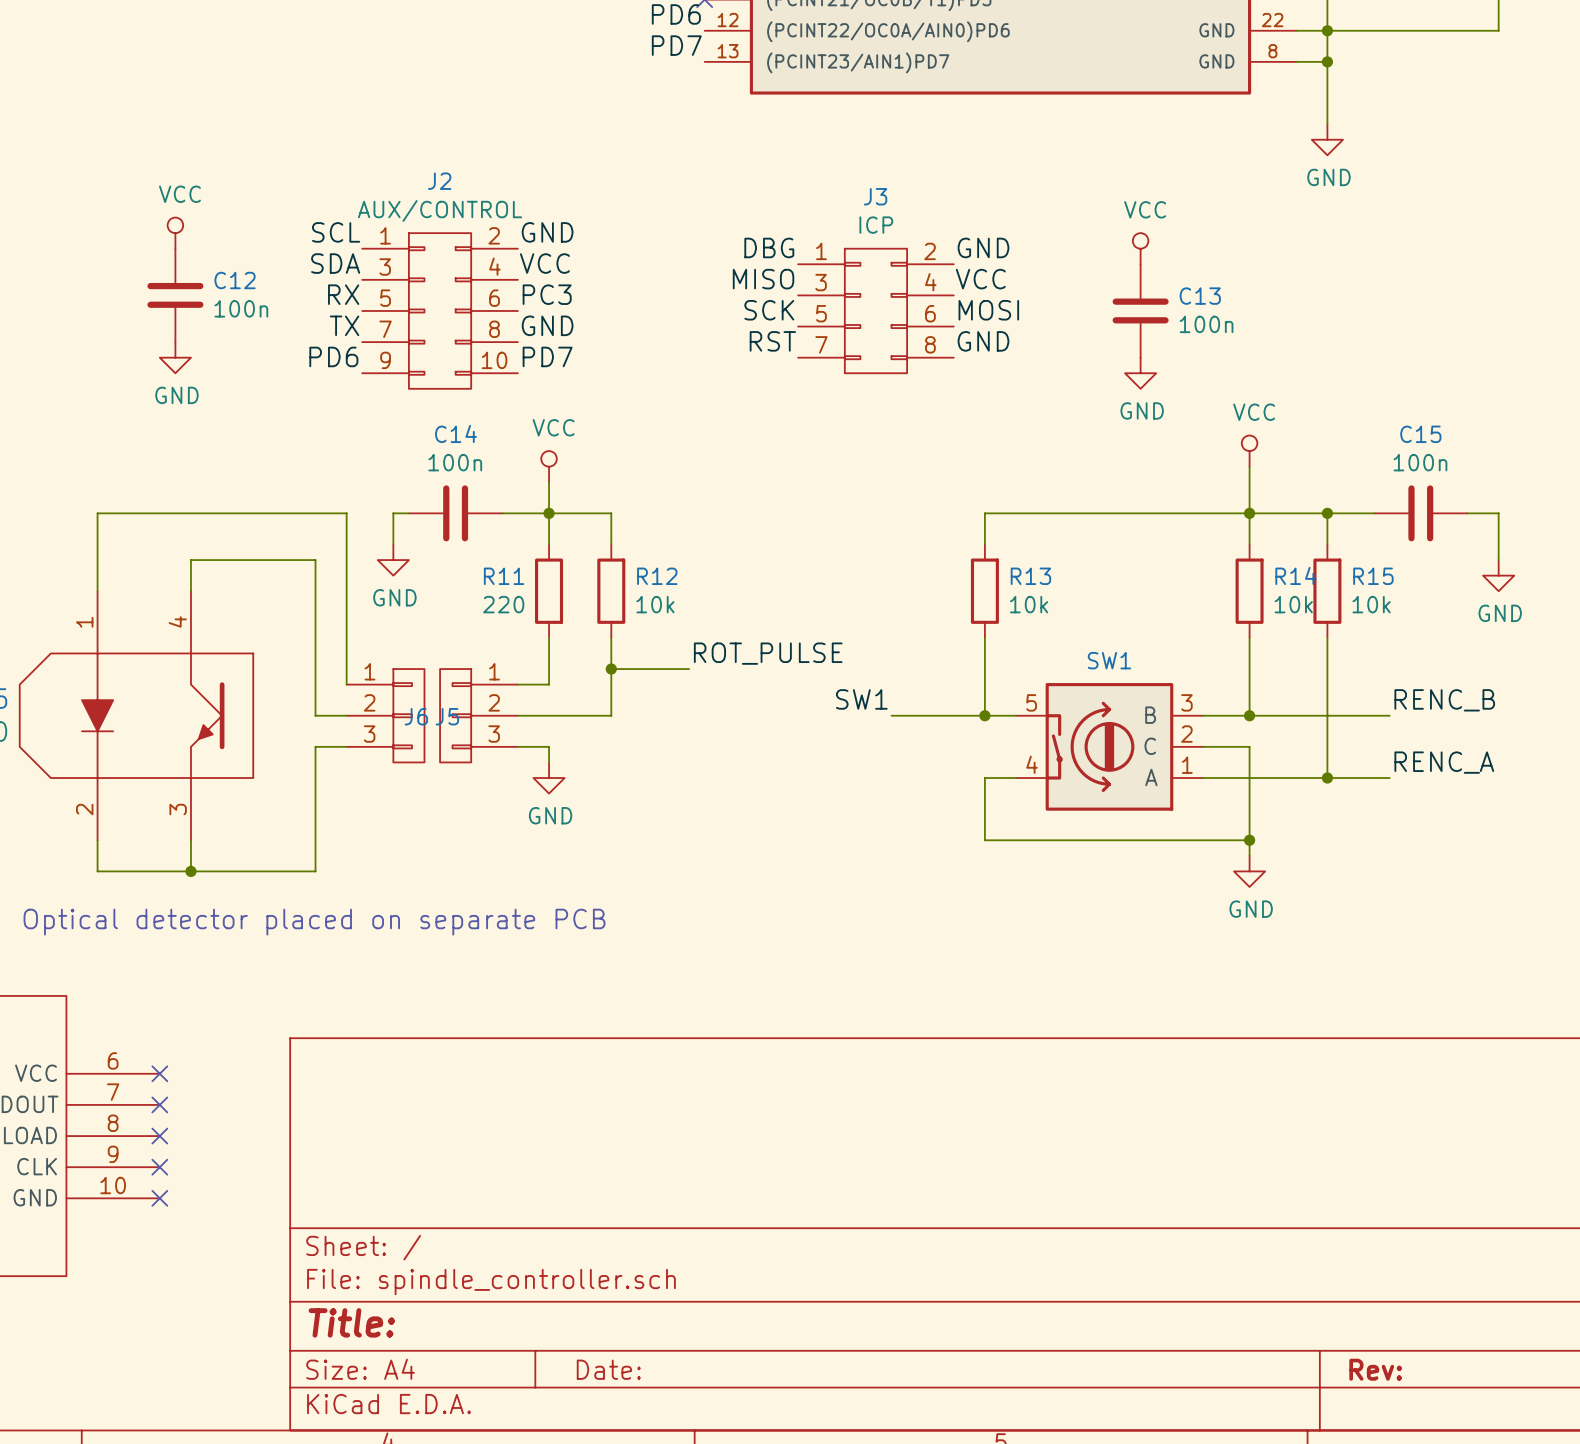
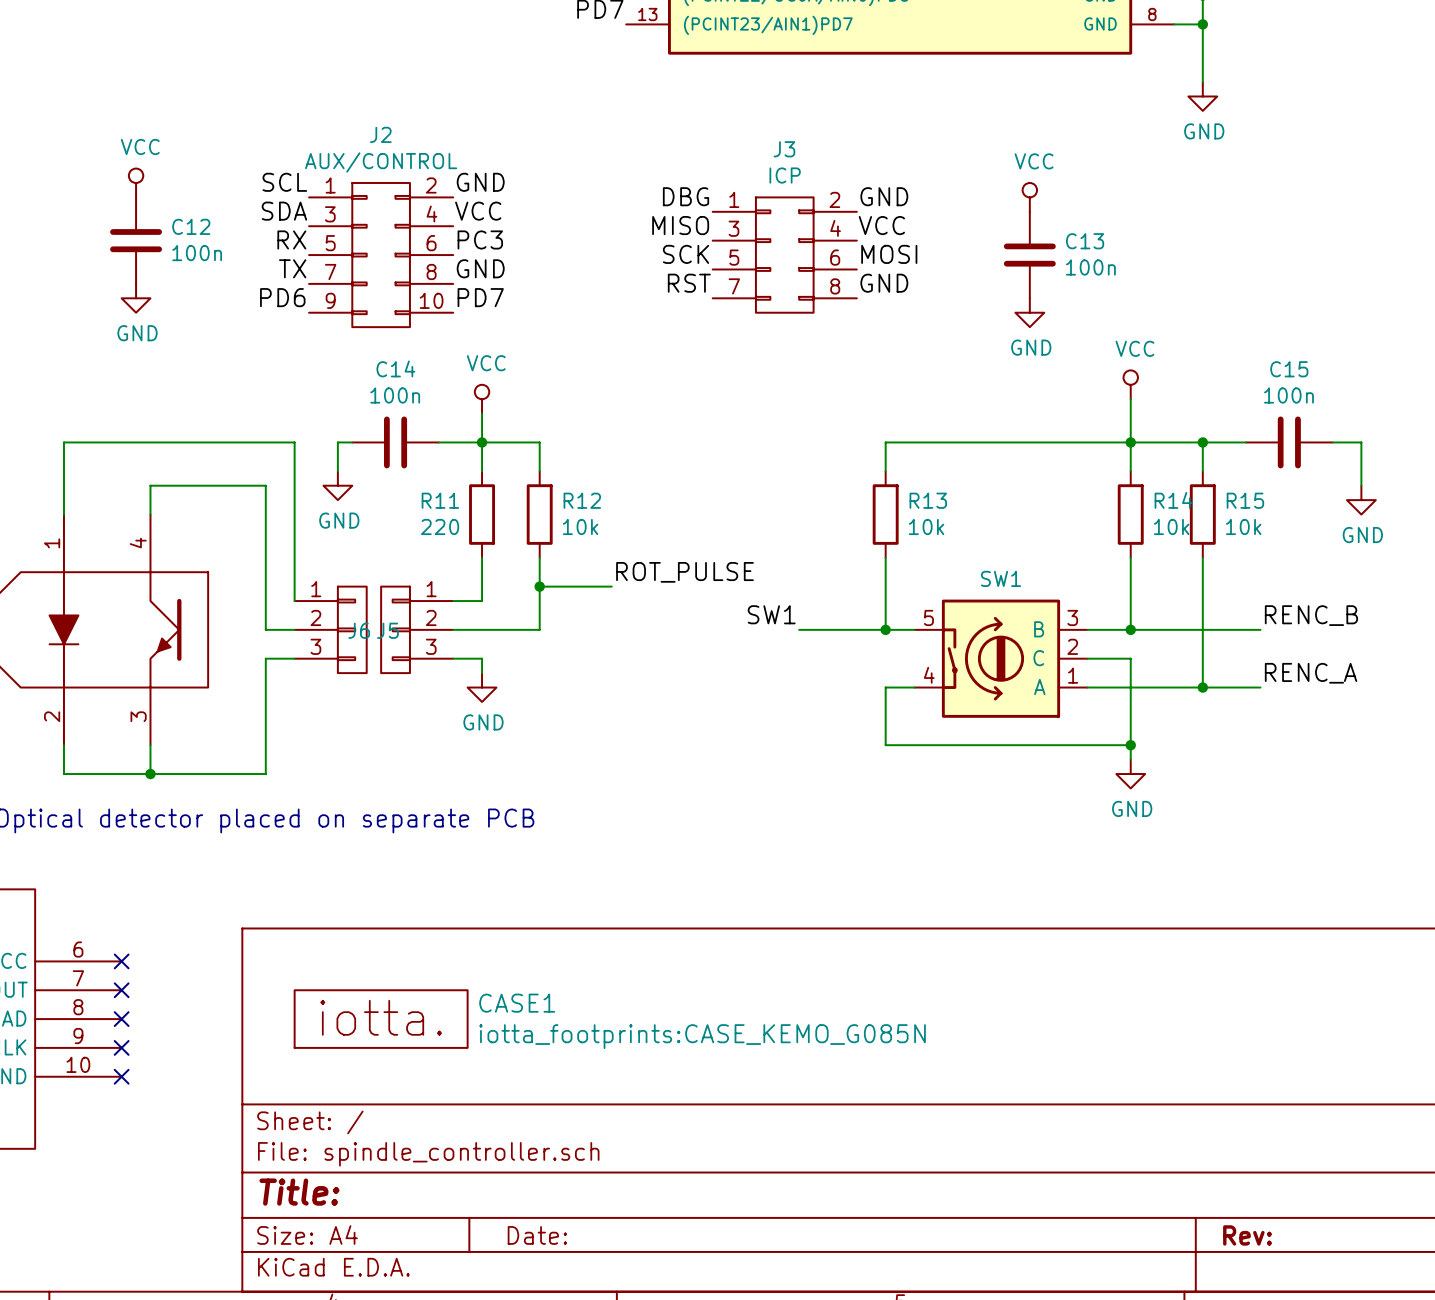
CASE1: none -> (381, 1019)

